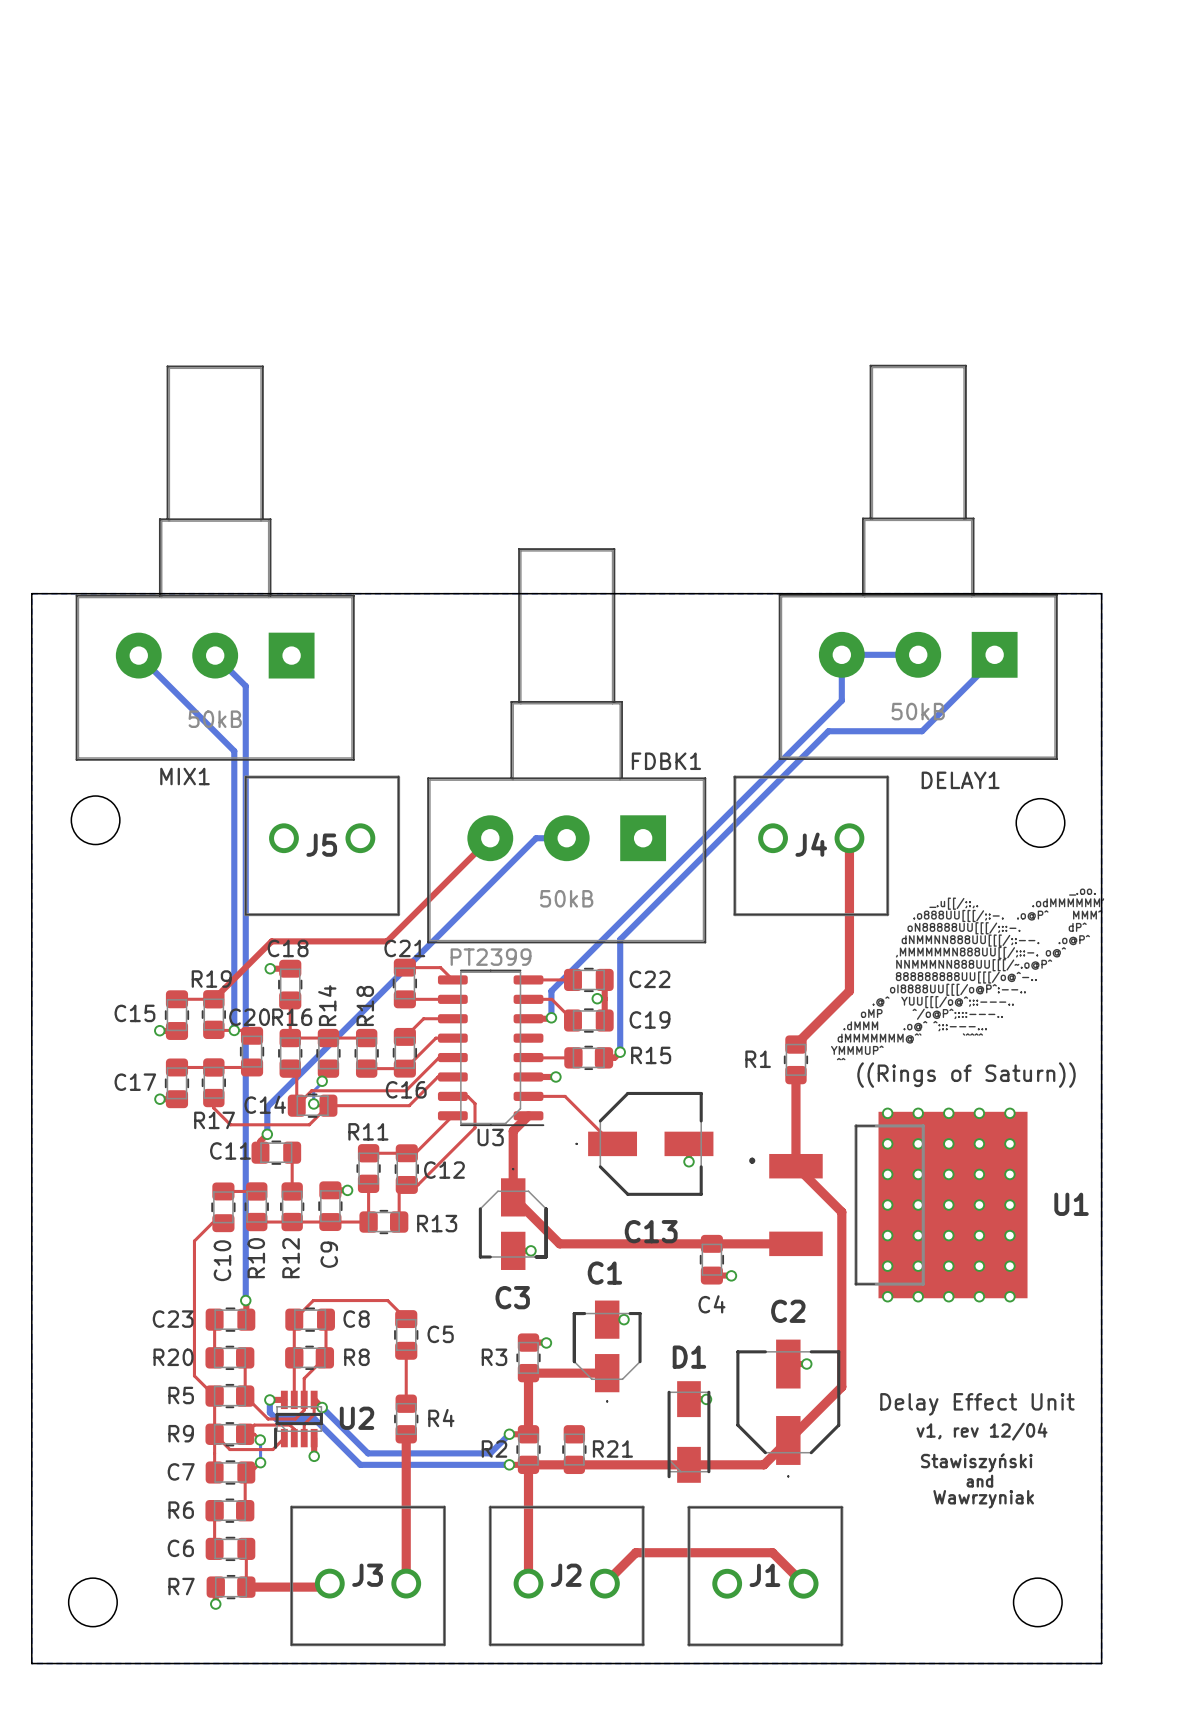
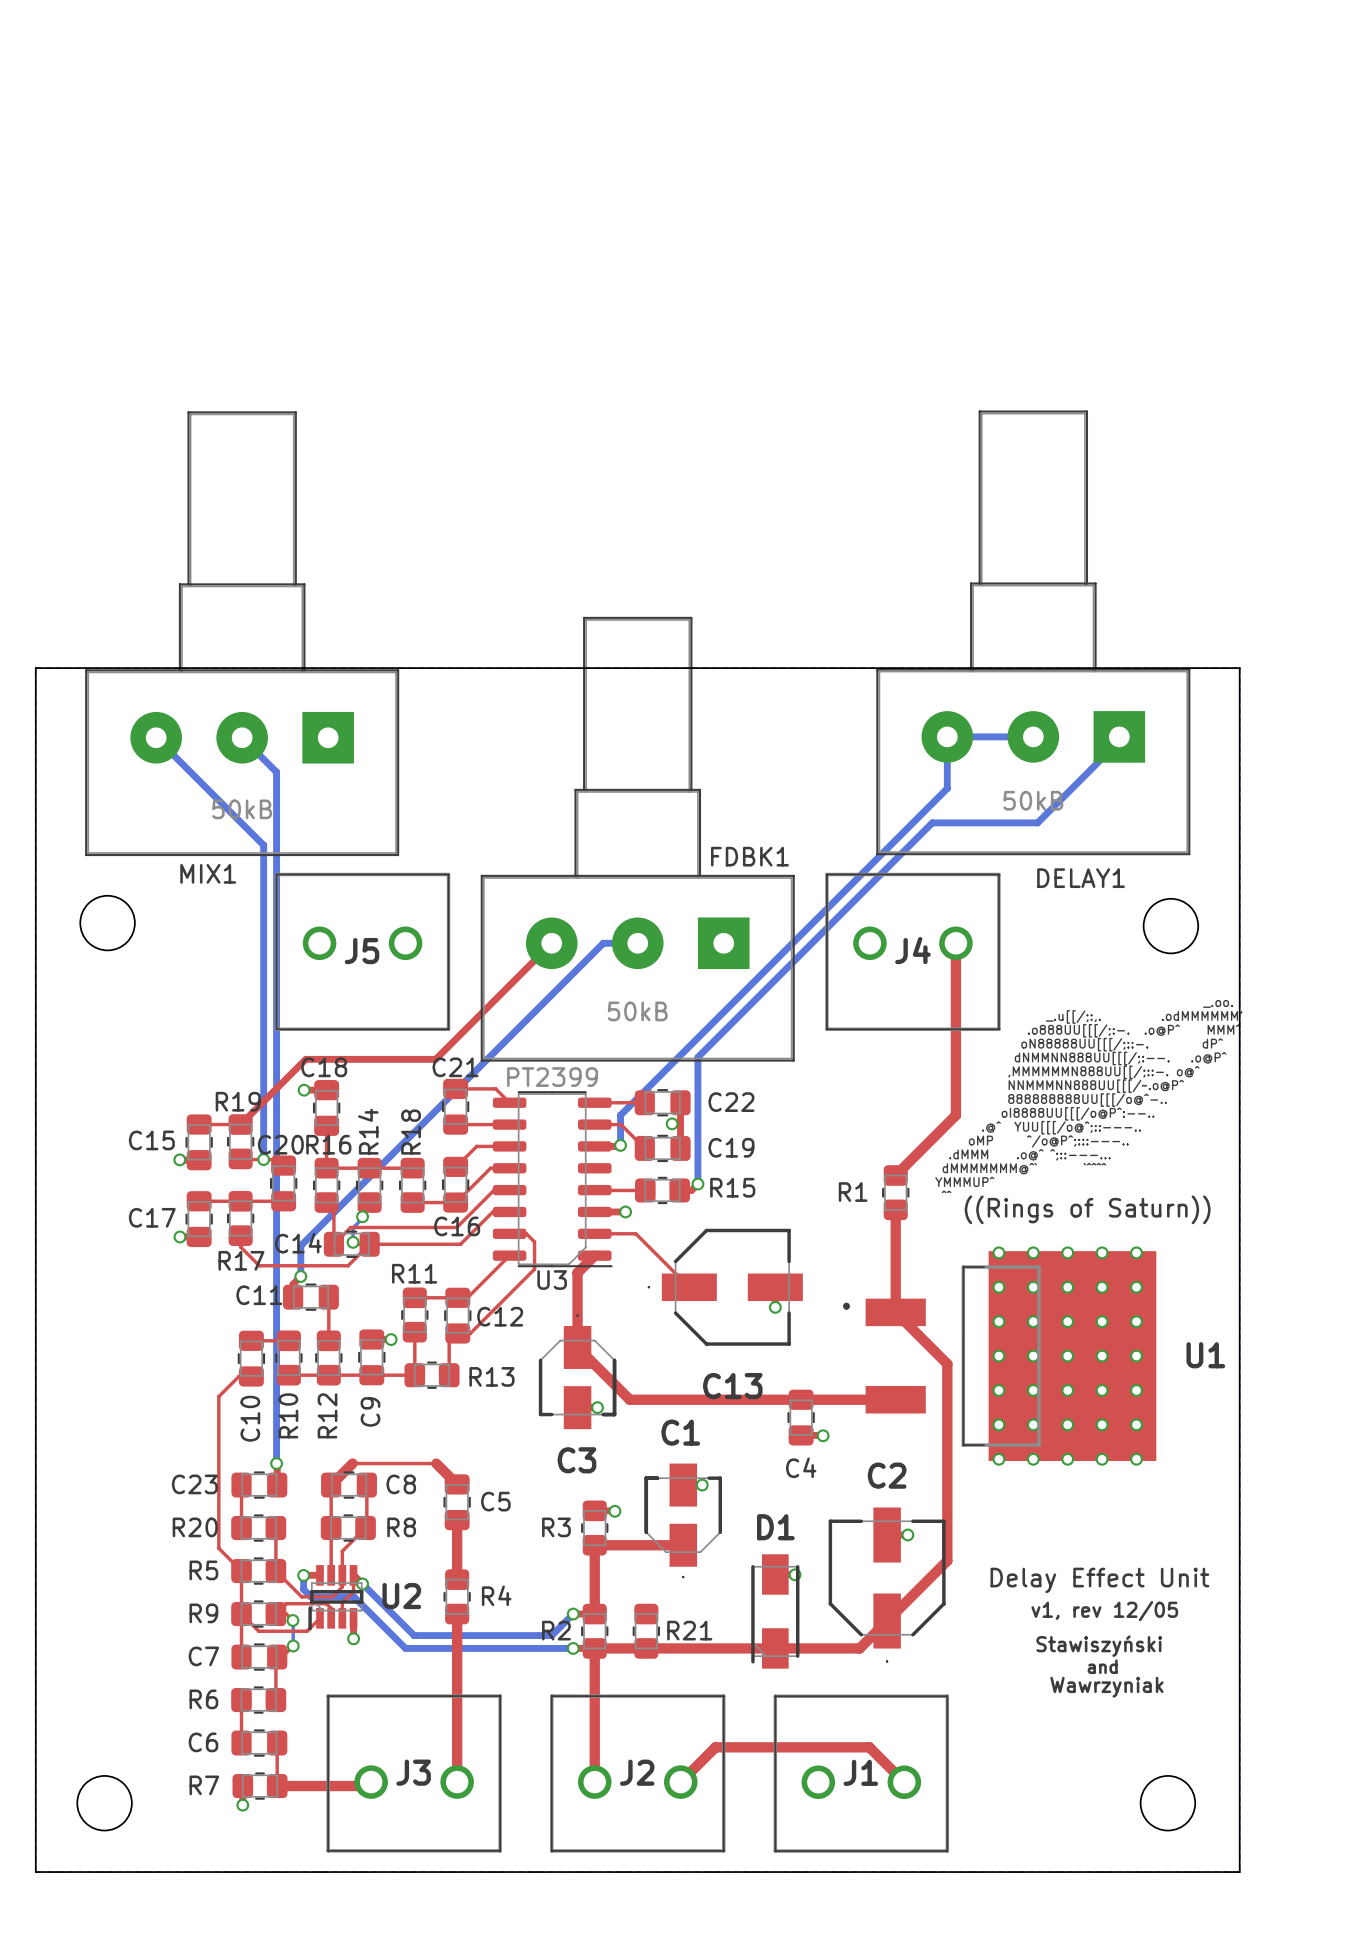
top track width: thin (313, 1300) (294, 1319) -> thick (352, 1463) (331, 1485)
top track width: thin (387, 1300) (406, 1319) -> thick (436, 1463) (457, 1484)
top track width: thin (406, 1350) (406, 1403) -> thick (457, 1520) (457, 1579)
text: v1, rev 12/04 (982, 1431) -> v1, rev 12/05 (1104, 1611)

